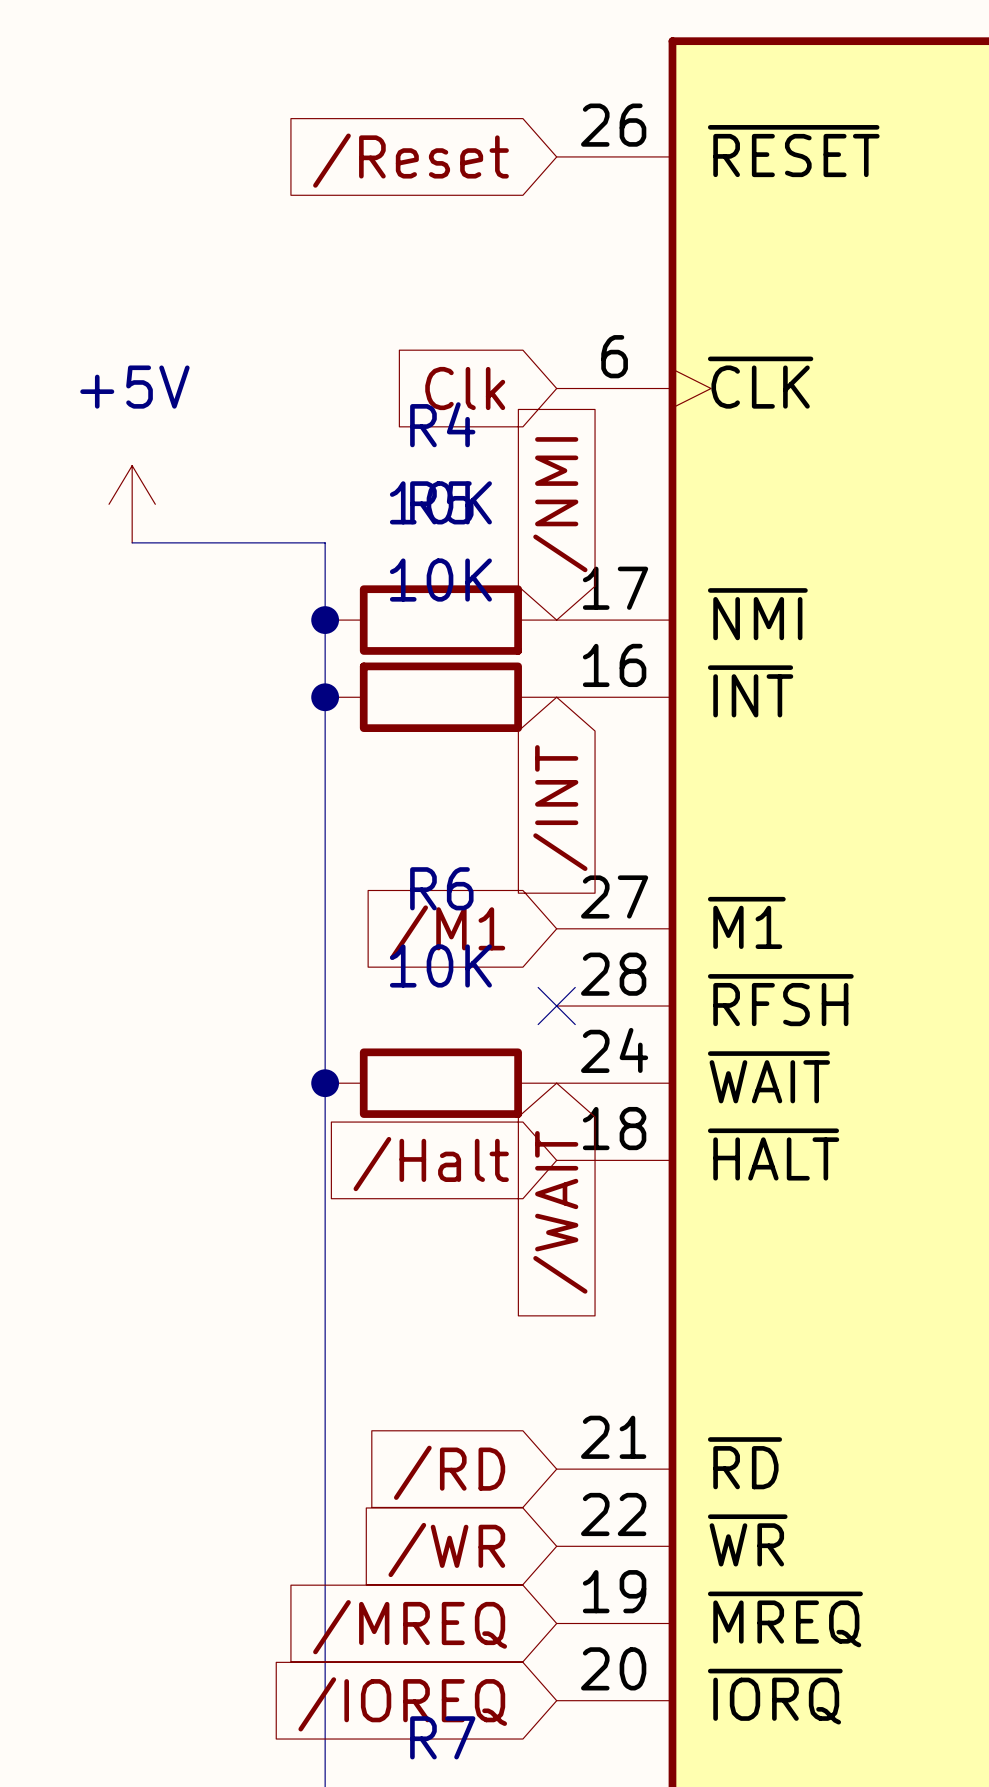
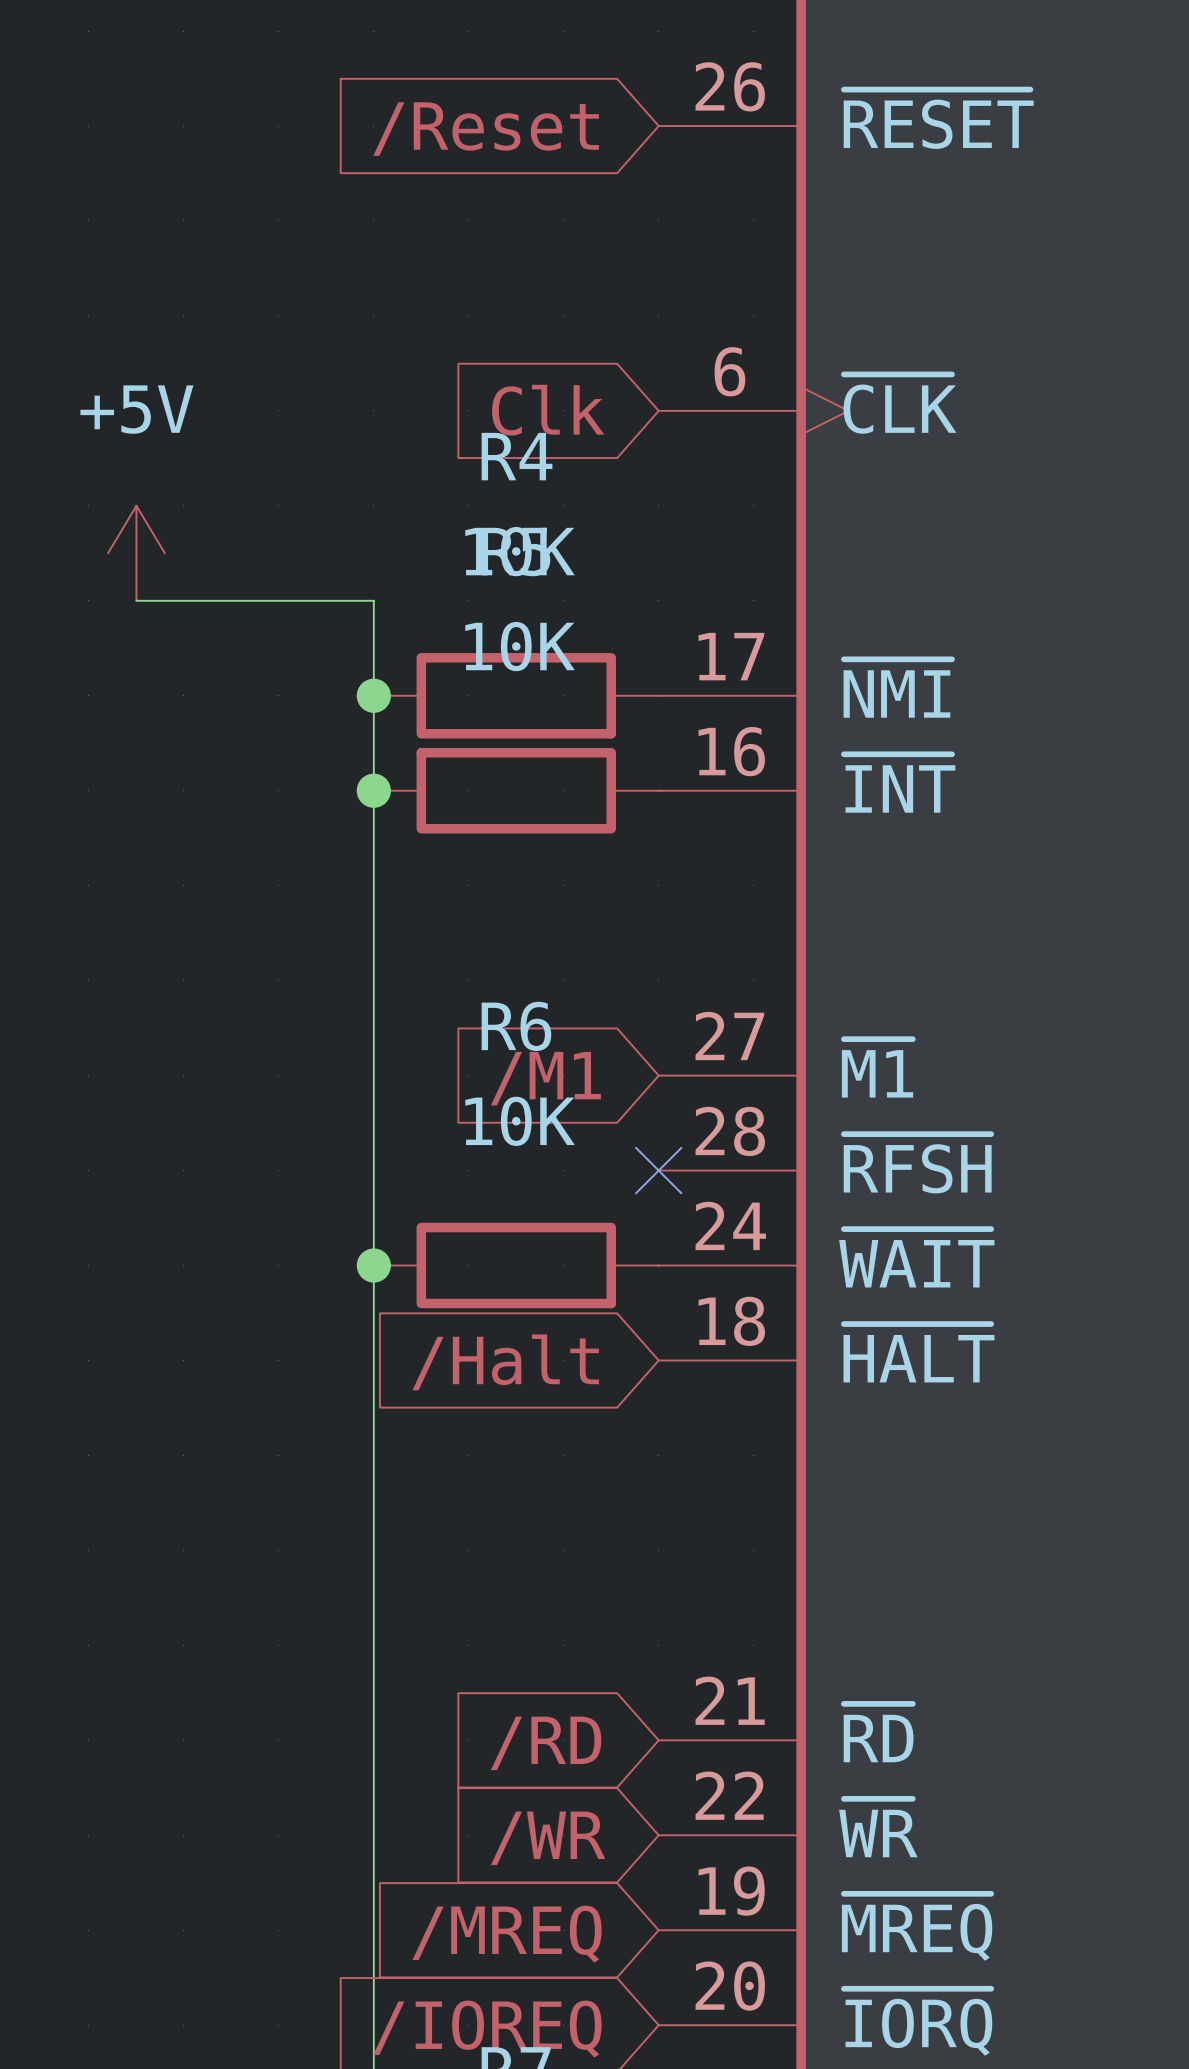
global label: /NMI (560, 504) -> none
global label: /INT (560, 808) -> none
global label: /WAIT (560, 1212) -> none

